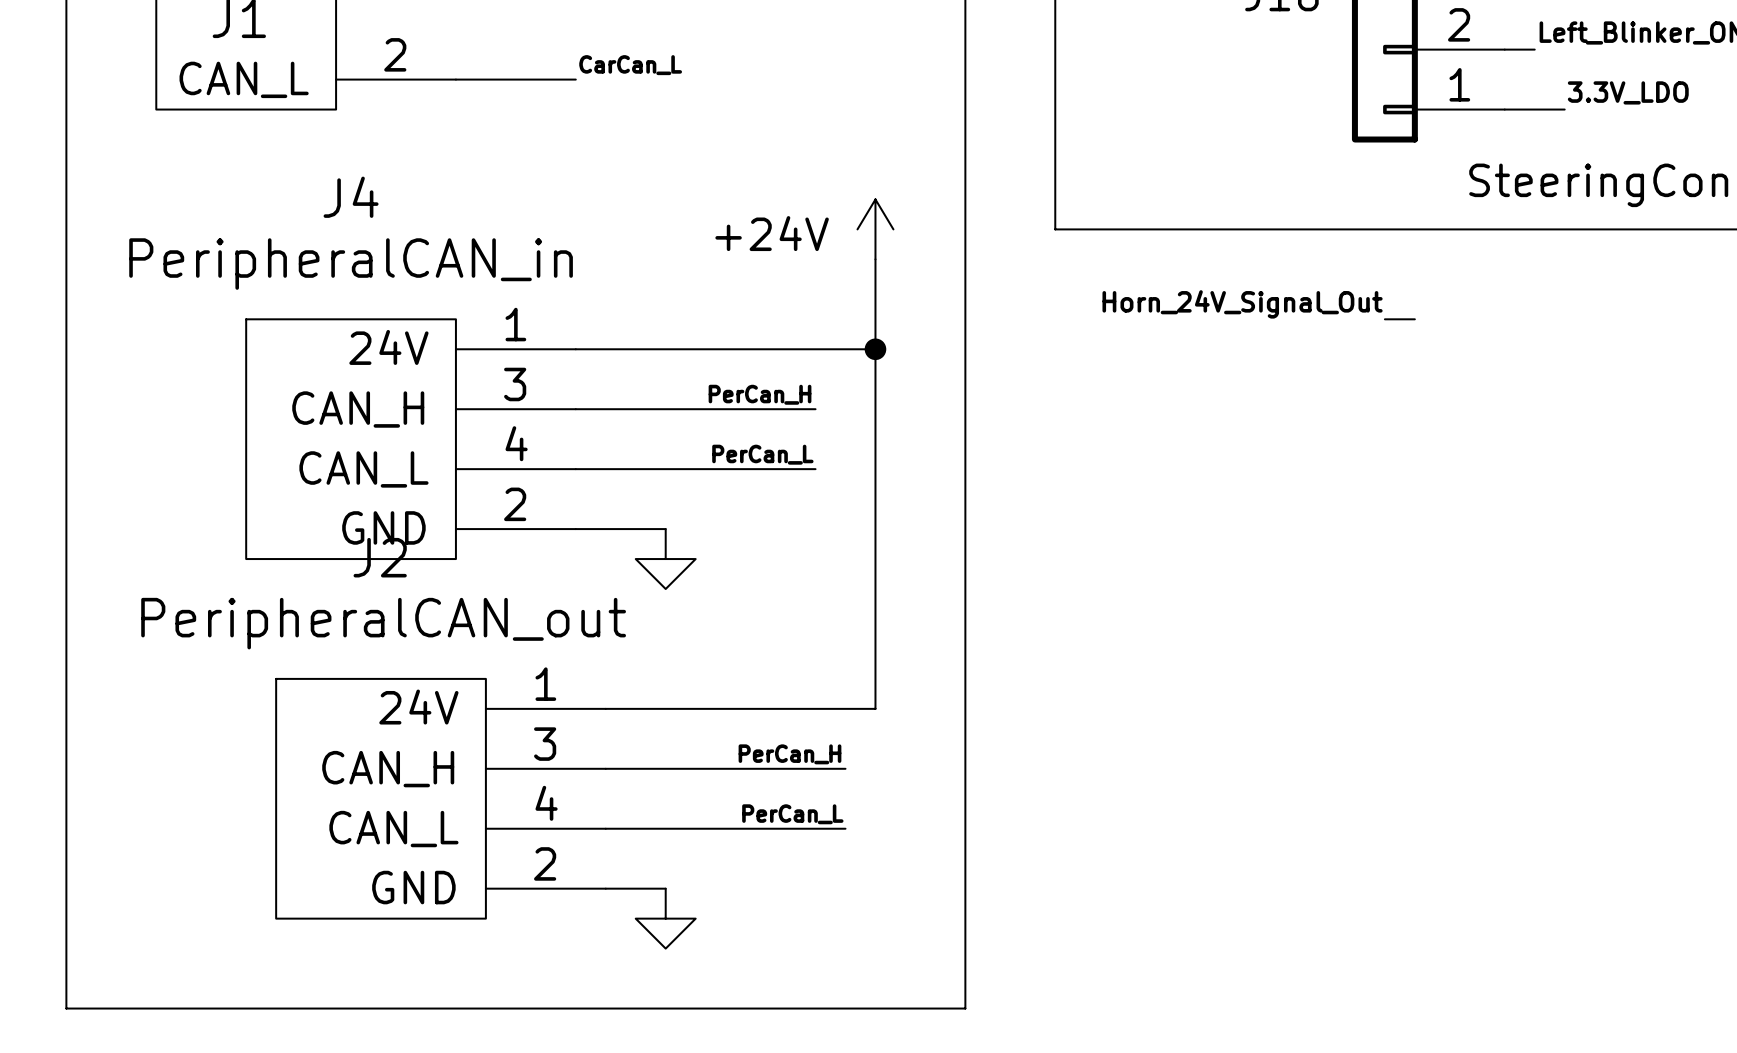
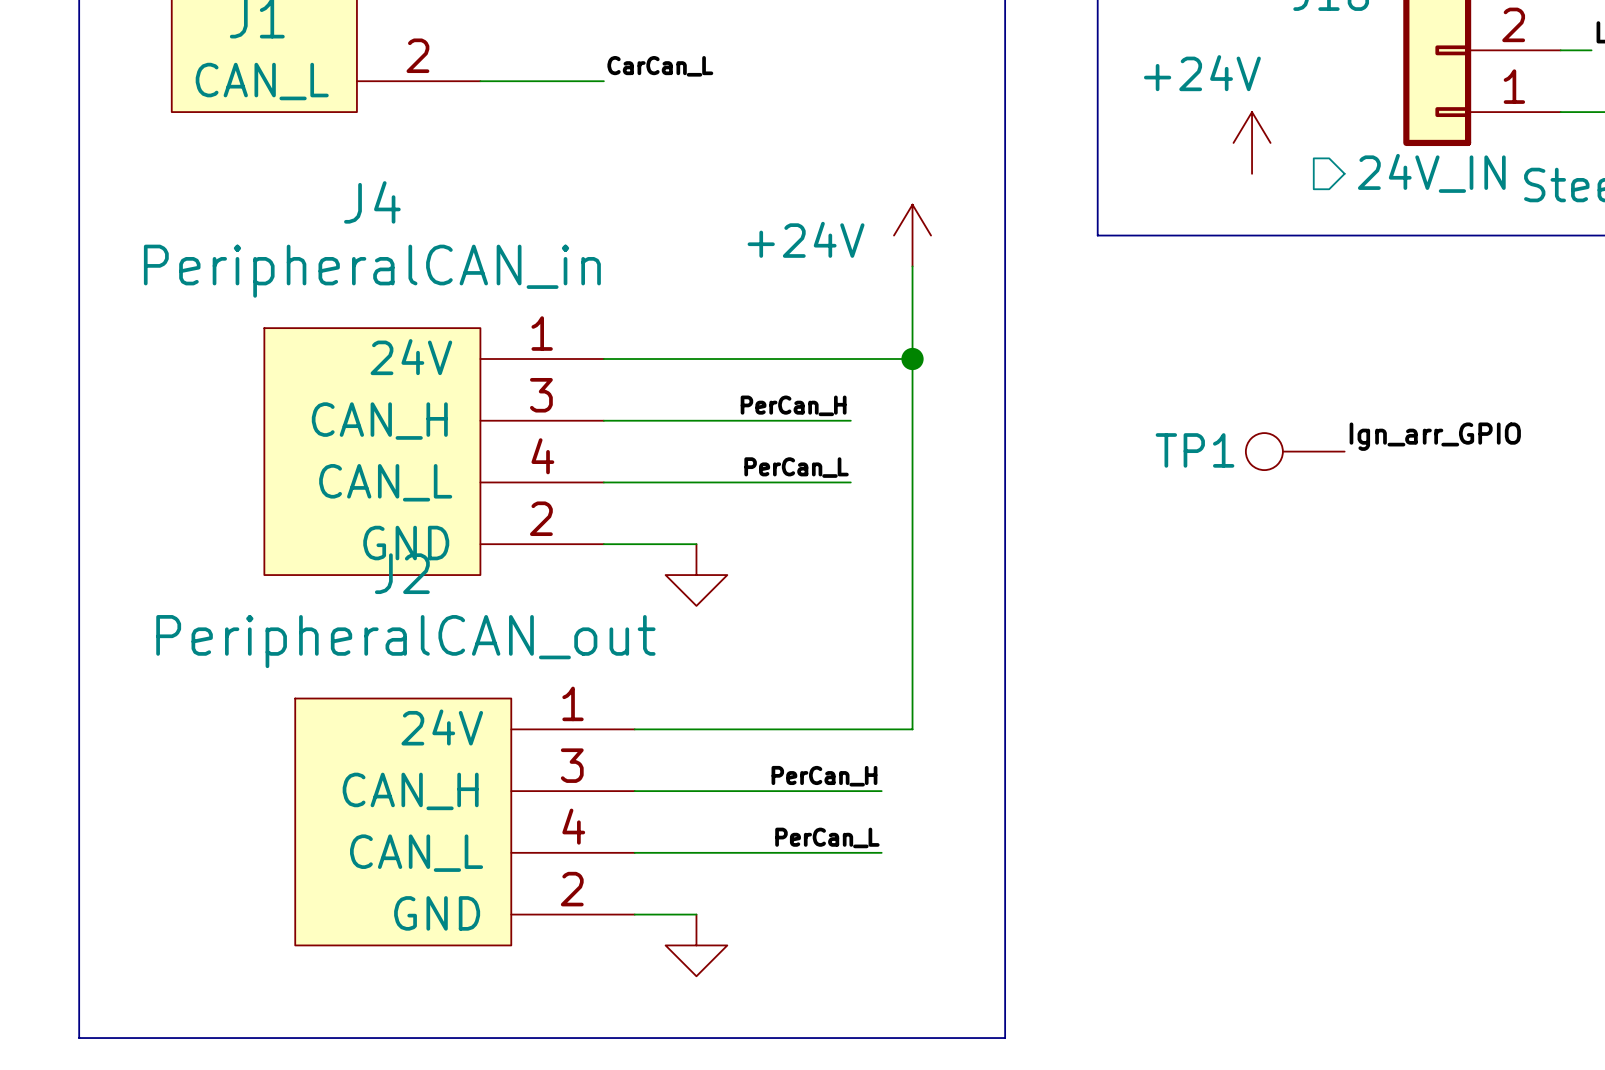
power symbol: none -> +24V (1252, 142)
sheet pin: none -> 24V_IN (1431, 173)
label: Horn_24V_Signal_Out (1242, 304) -> none
wire: (1384, 319) (1414, 319) -> none
label: none -> Ign_arr_GPIO (1435, 436)
TP1: none -> (1295, 451)

